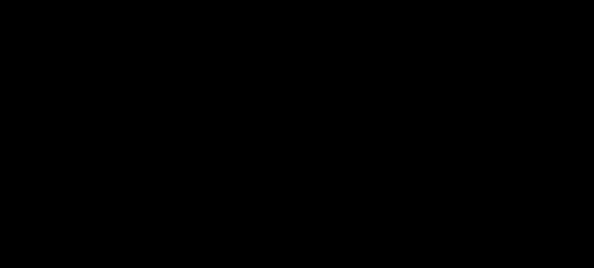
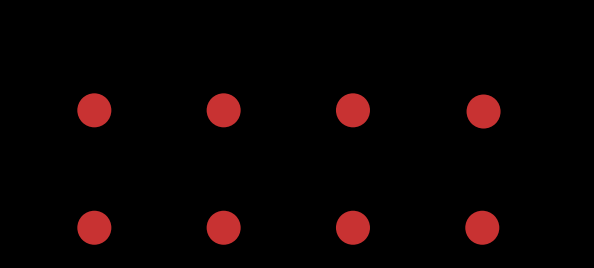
part: none -> (94, 110)
part: none -> (223, 110)
part: none -> (352, 110)
part: none -> (483, 111)
part: none -> (94, 227)
part: none -> (223, 227)
part: none -> (352, 227)
part: none -> (482, 227)

